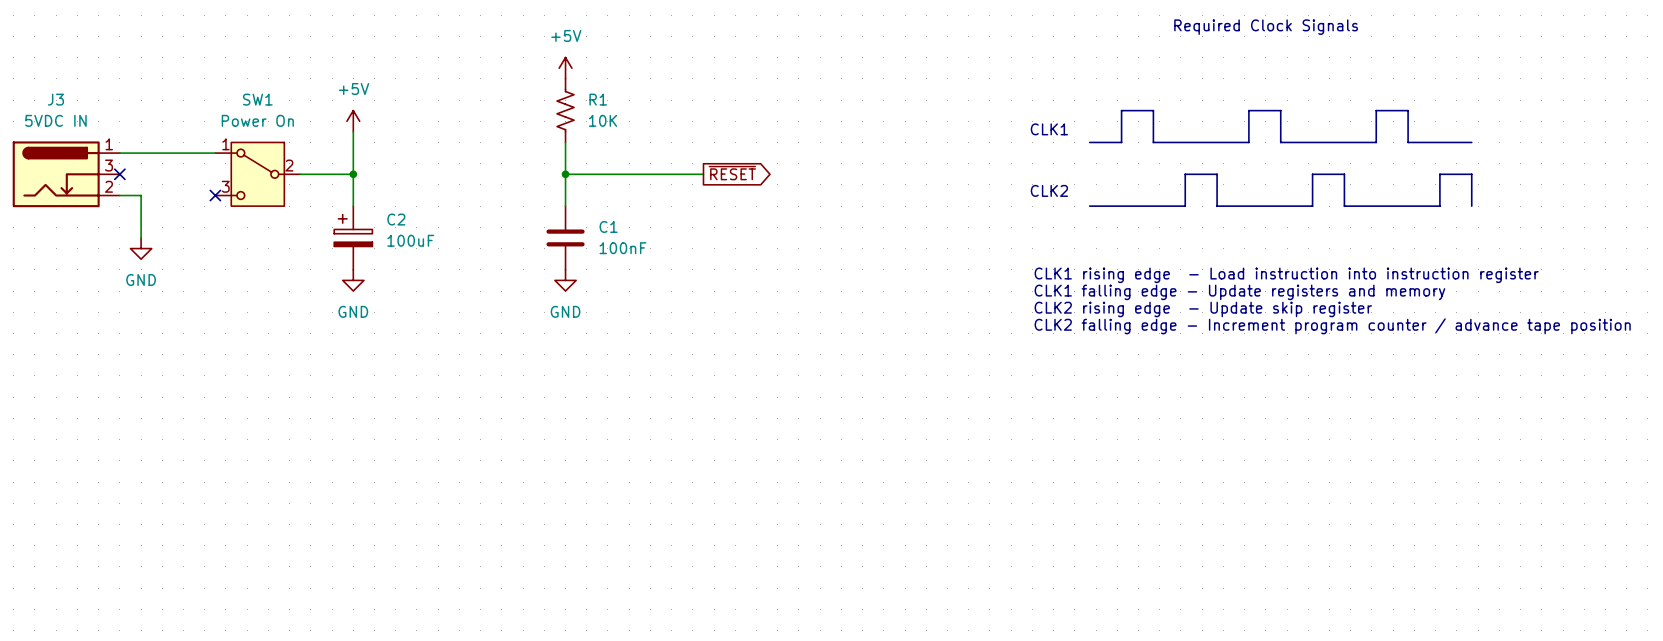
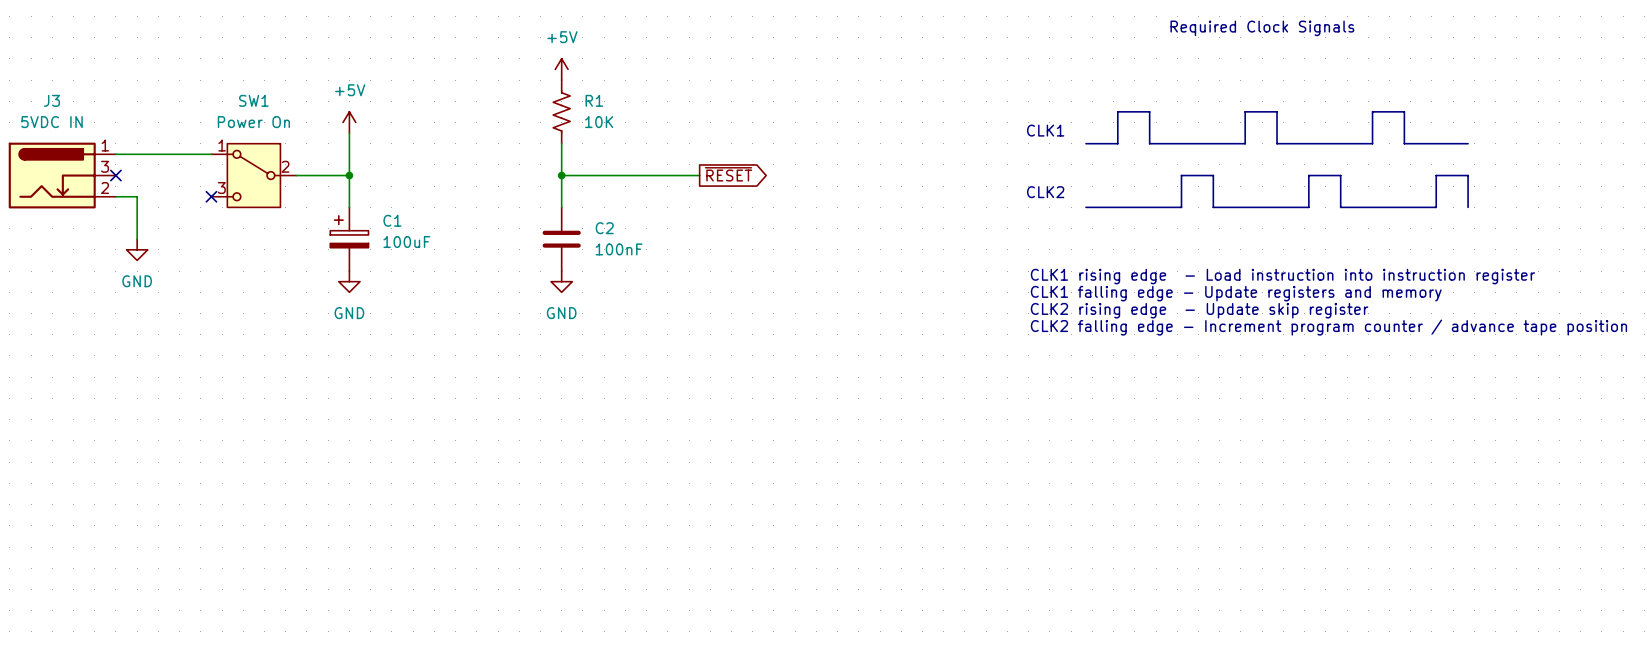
C2 name: C2 (396, 219) -> C1 (392, 220)
C1 name: C1 (608, 226) -> C2 (604, 228)

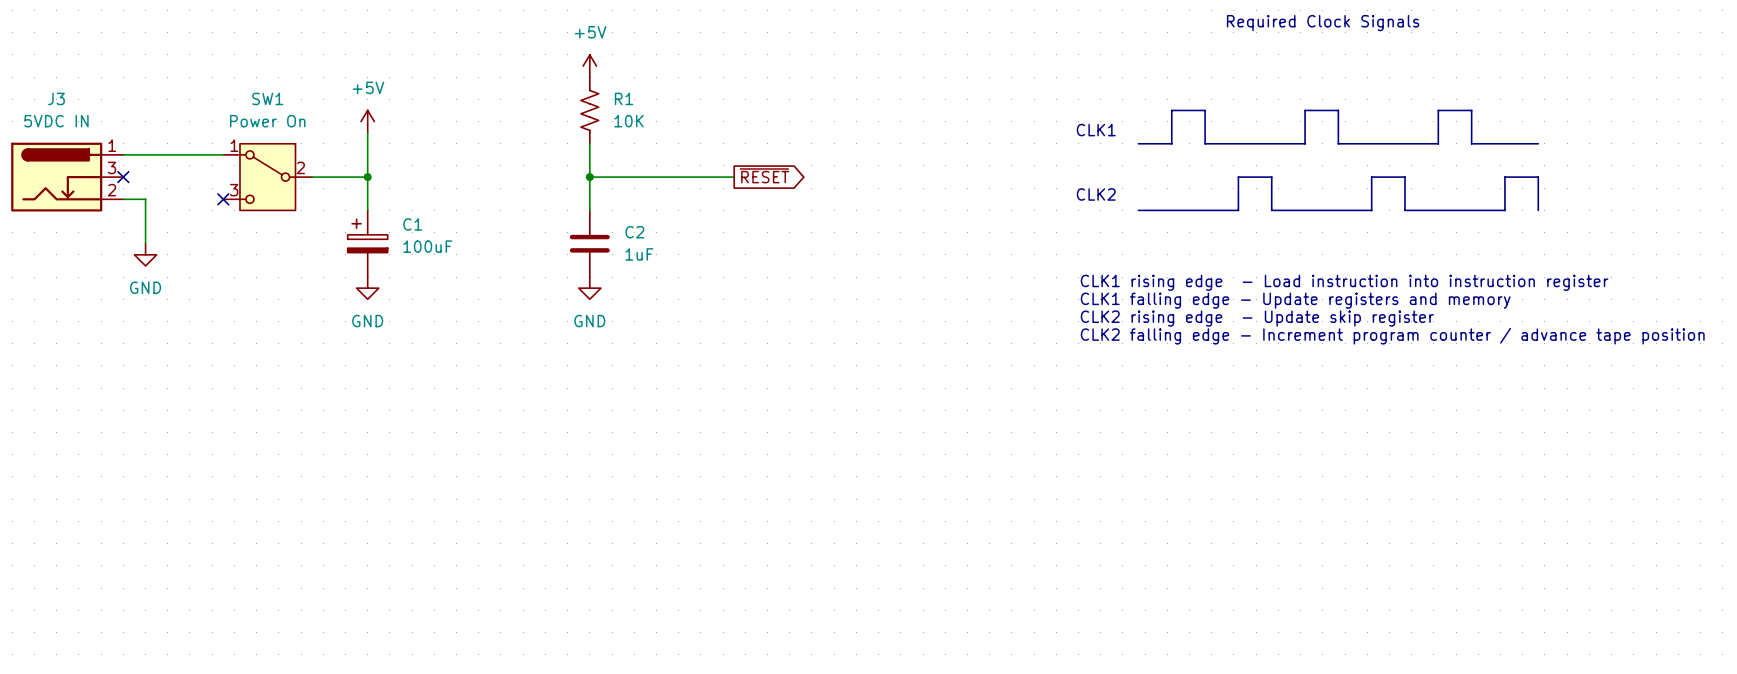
C2 value: 100nF (619, 249) -> 1uF (639, 254)

